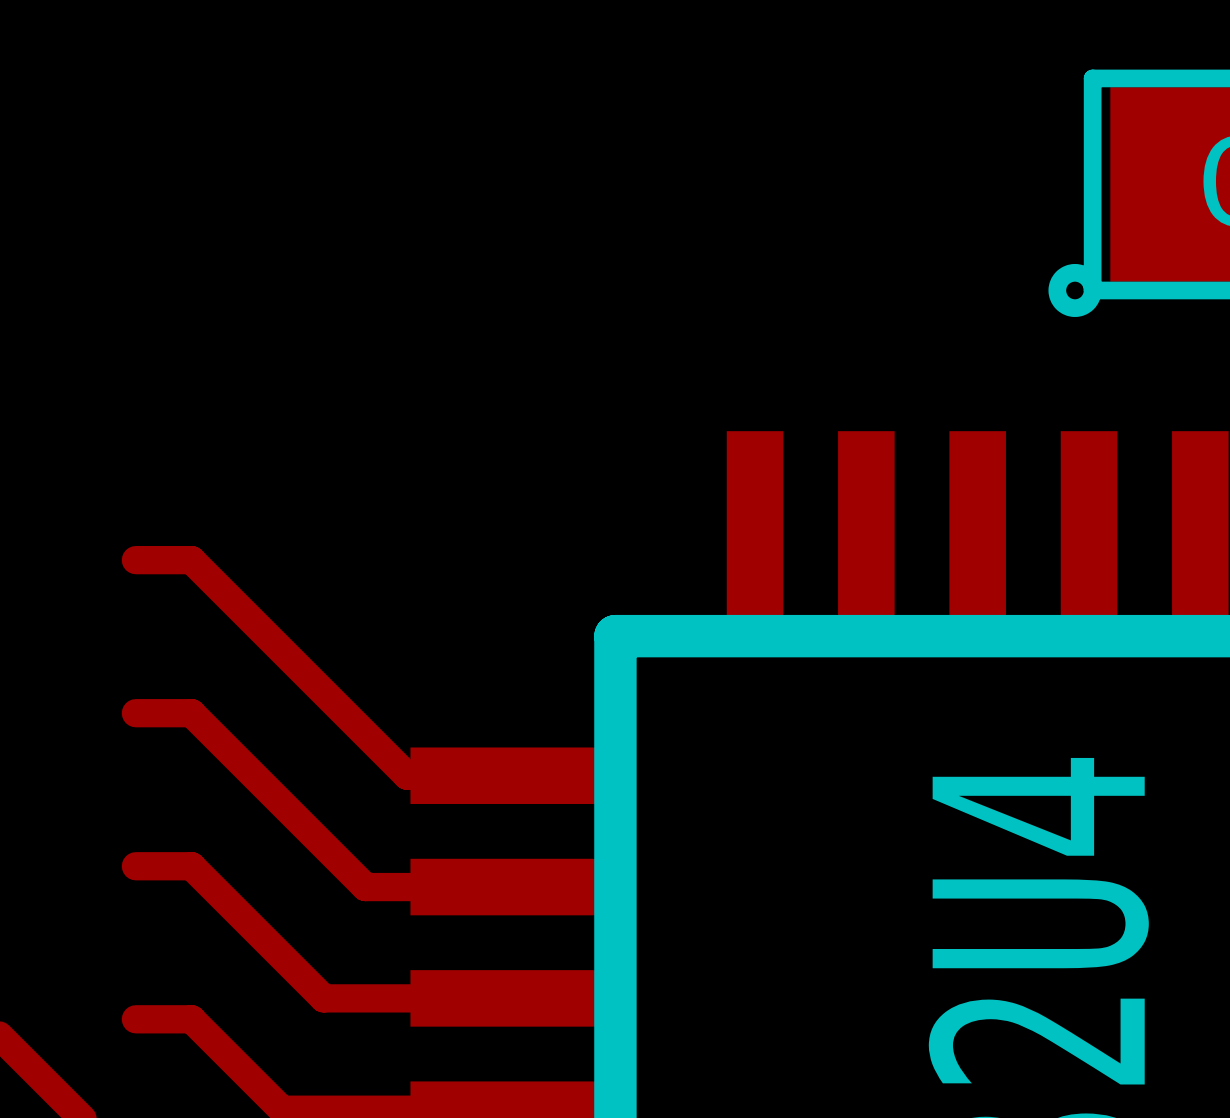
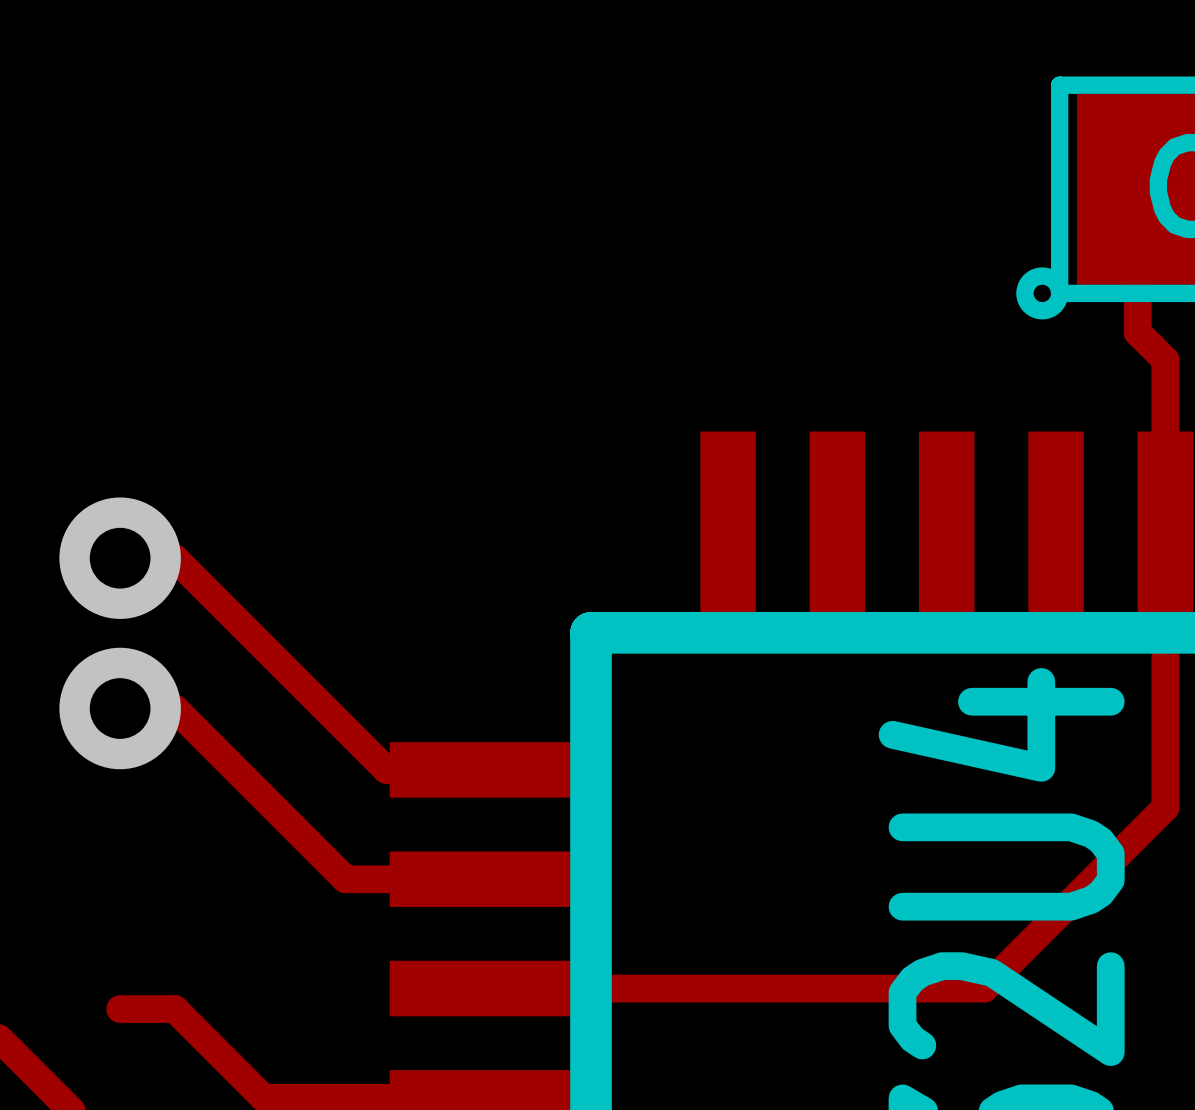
via: none -> (120, 558)
via: none -> (120, 708)
track: (135, 866) (191, 866) (323, 998) (516, 998) -> (1137, 189) (1137, 332) (1165, 360) (1165, 807) (984, 988) (493, 988)

